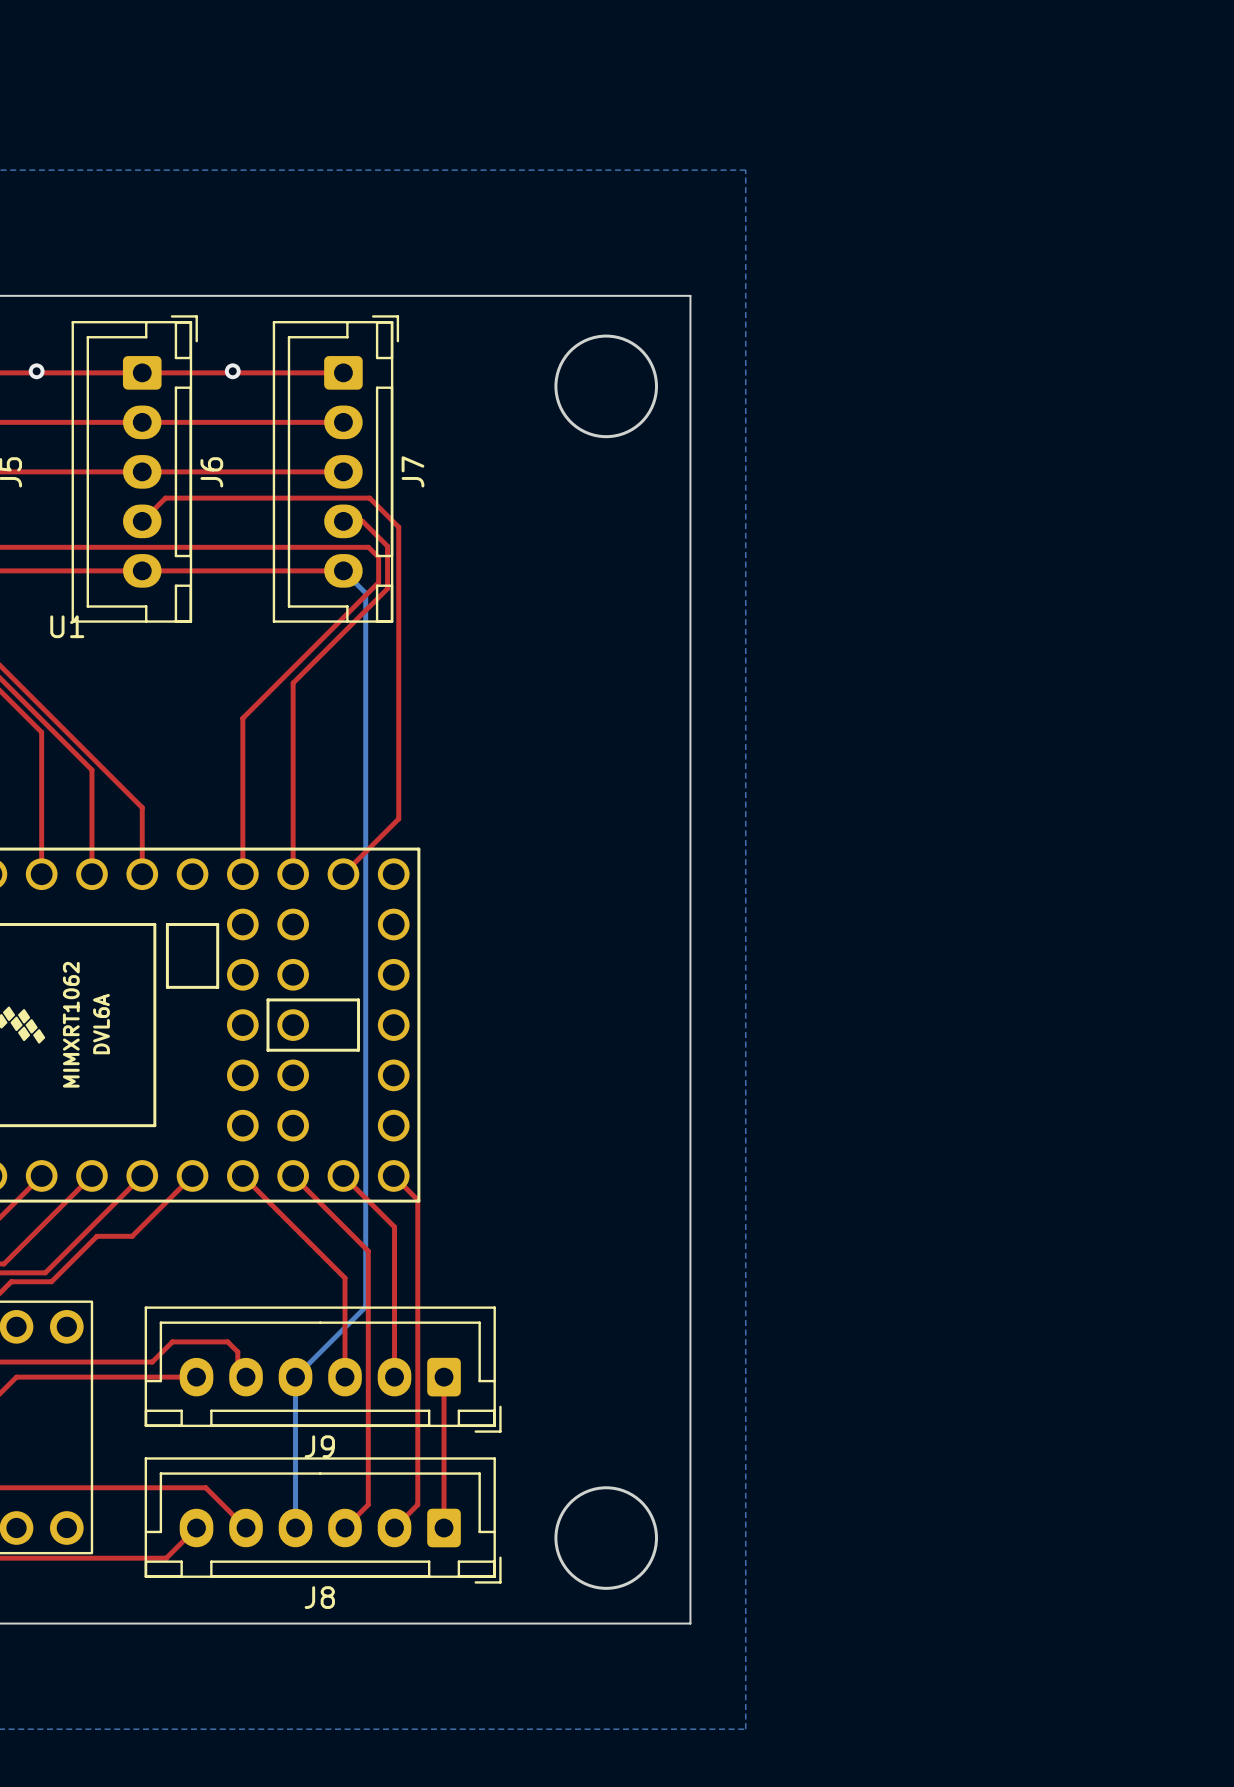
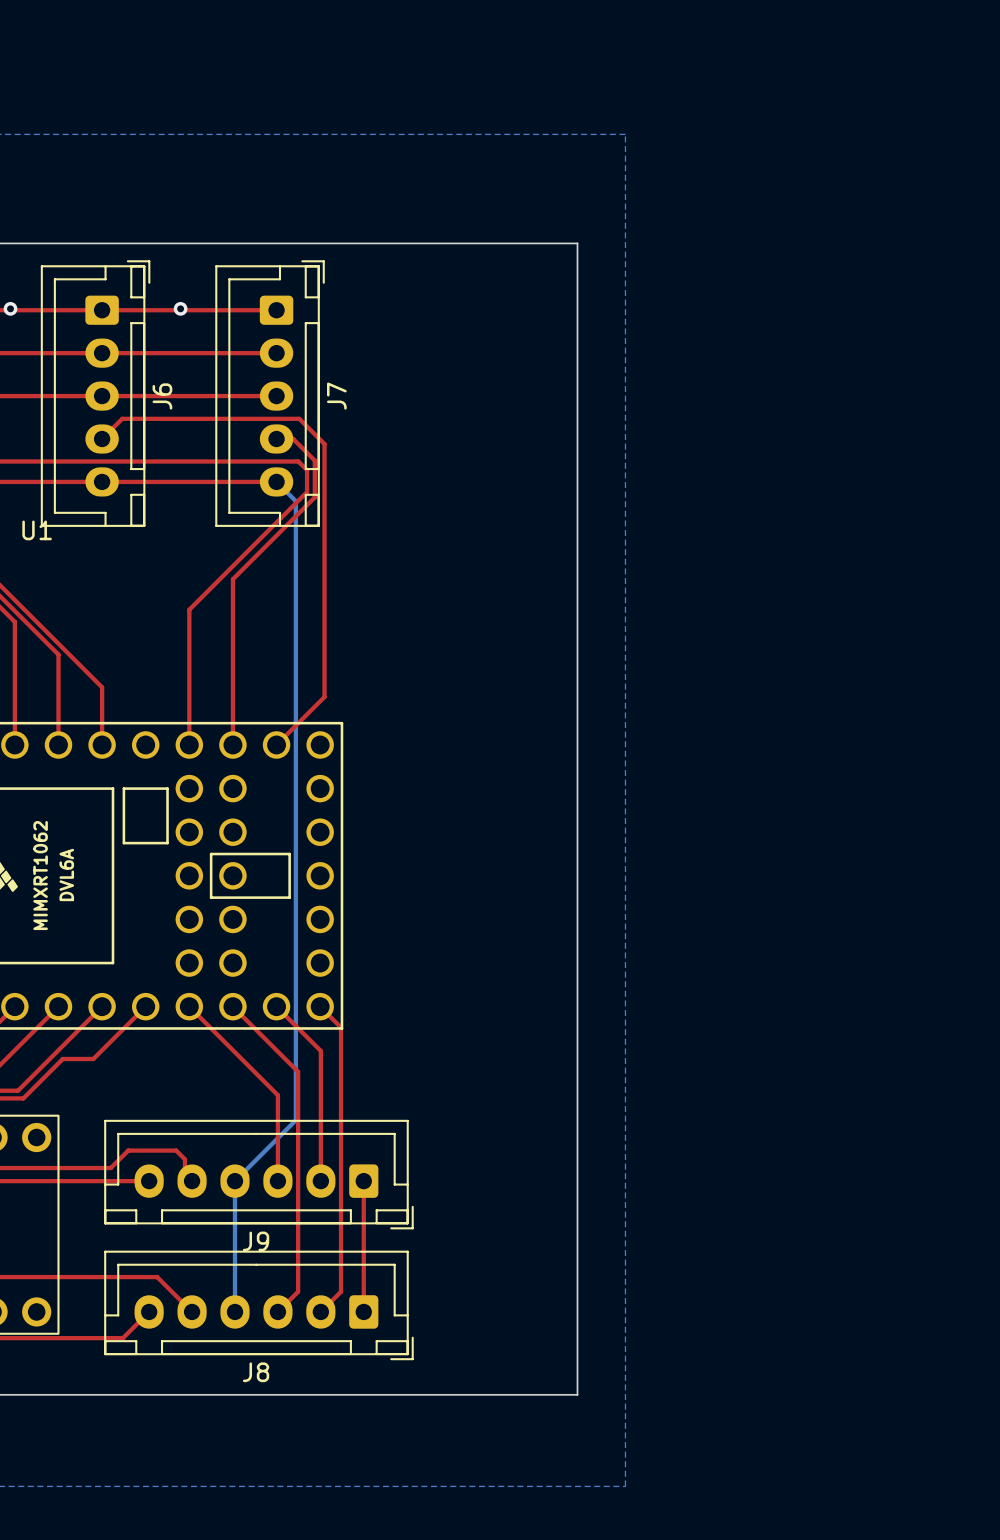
round board edge: [554, 334, 658, 439] -> none
round board edge: [554, 1486, 658, 1590] -> none

